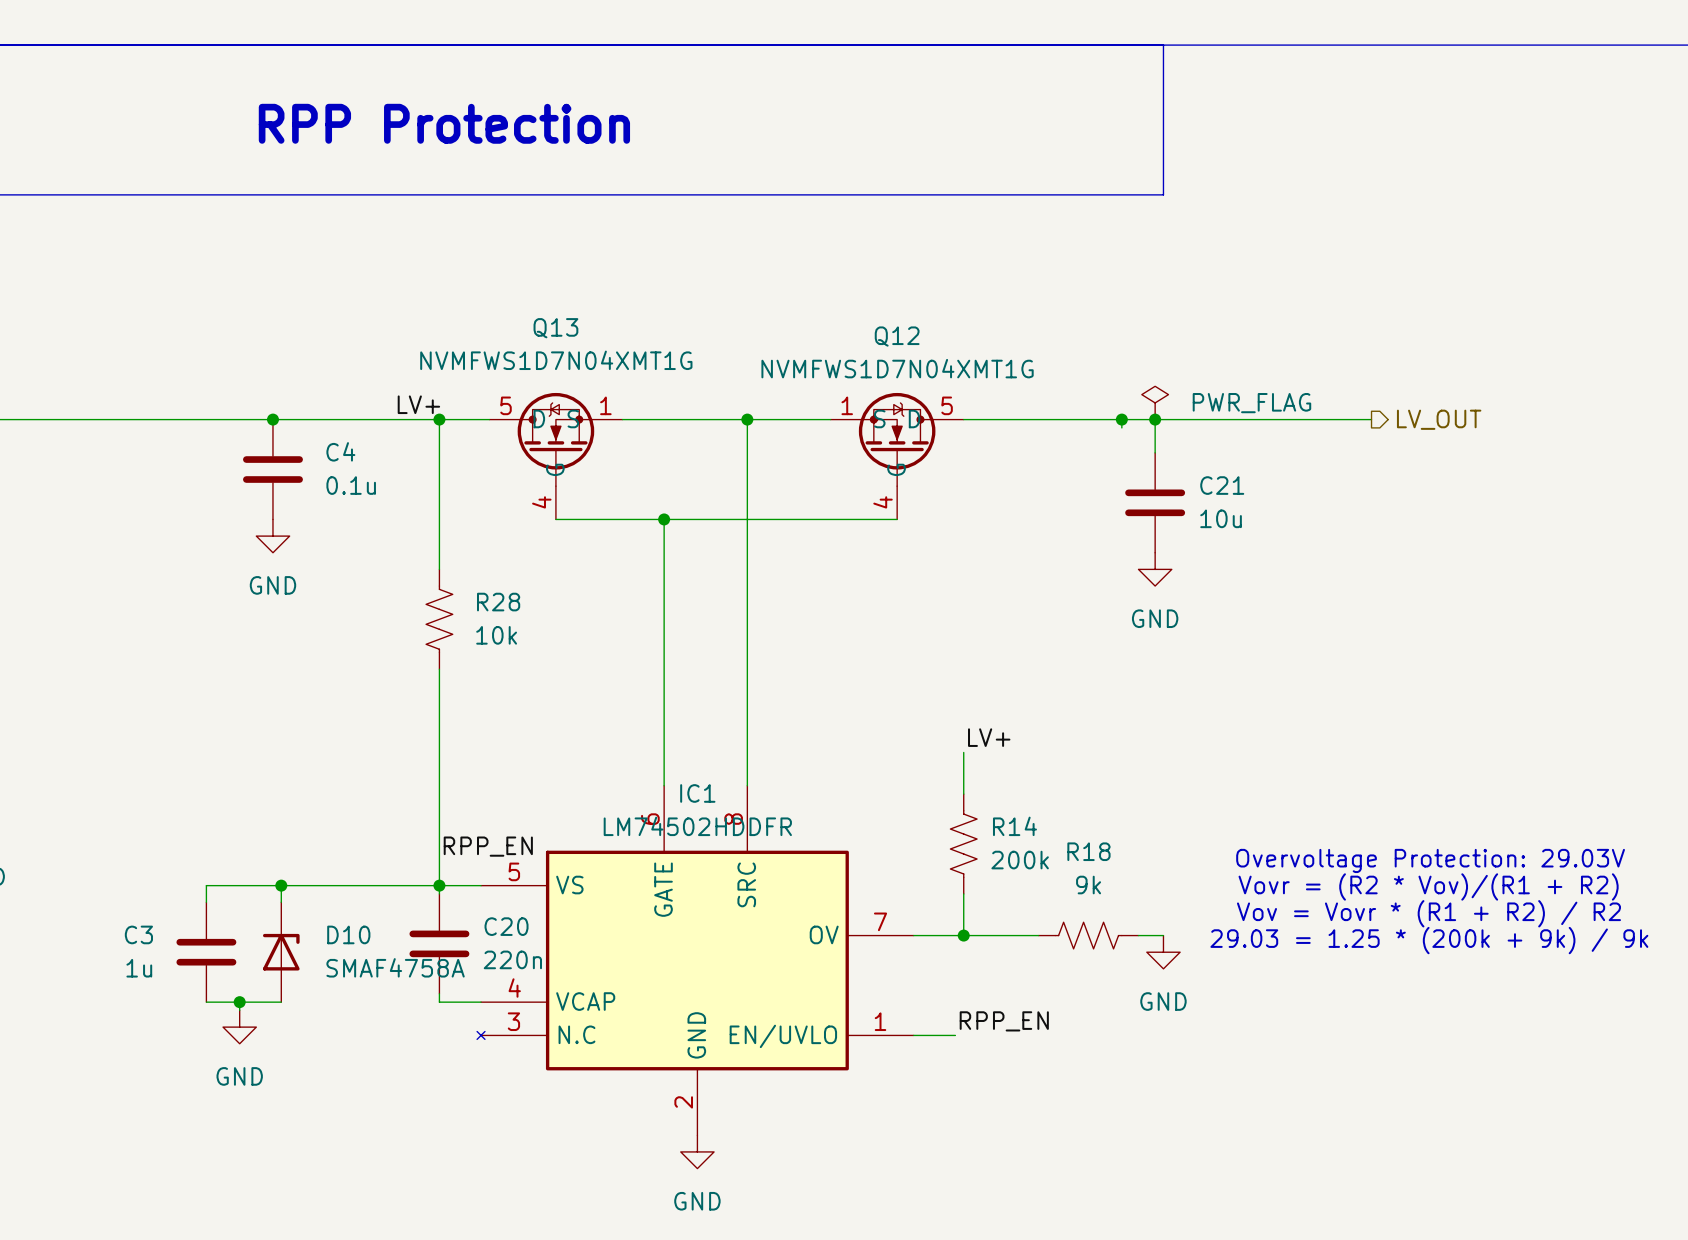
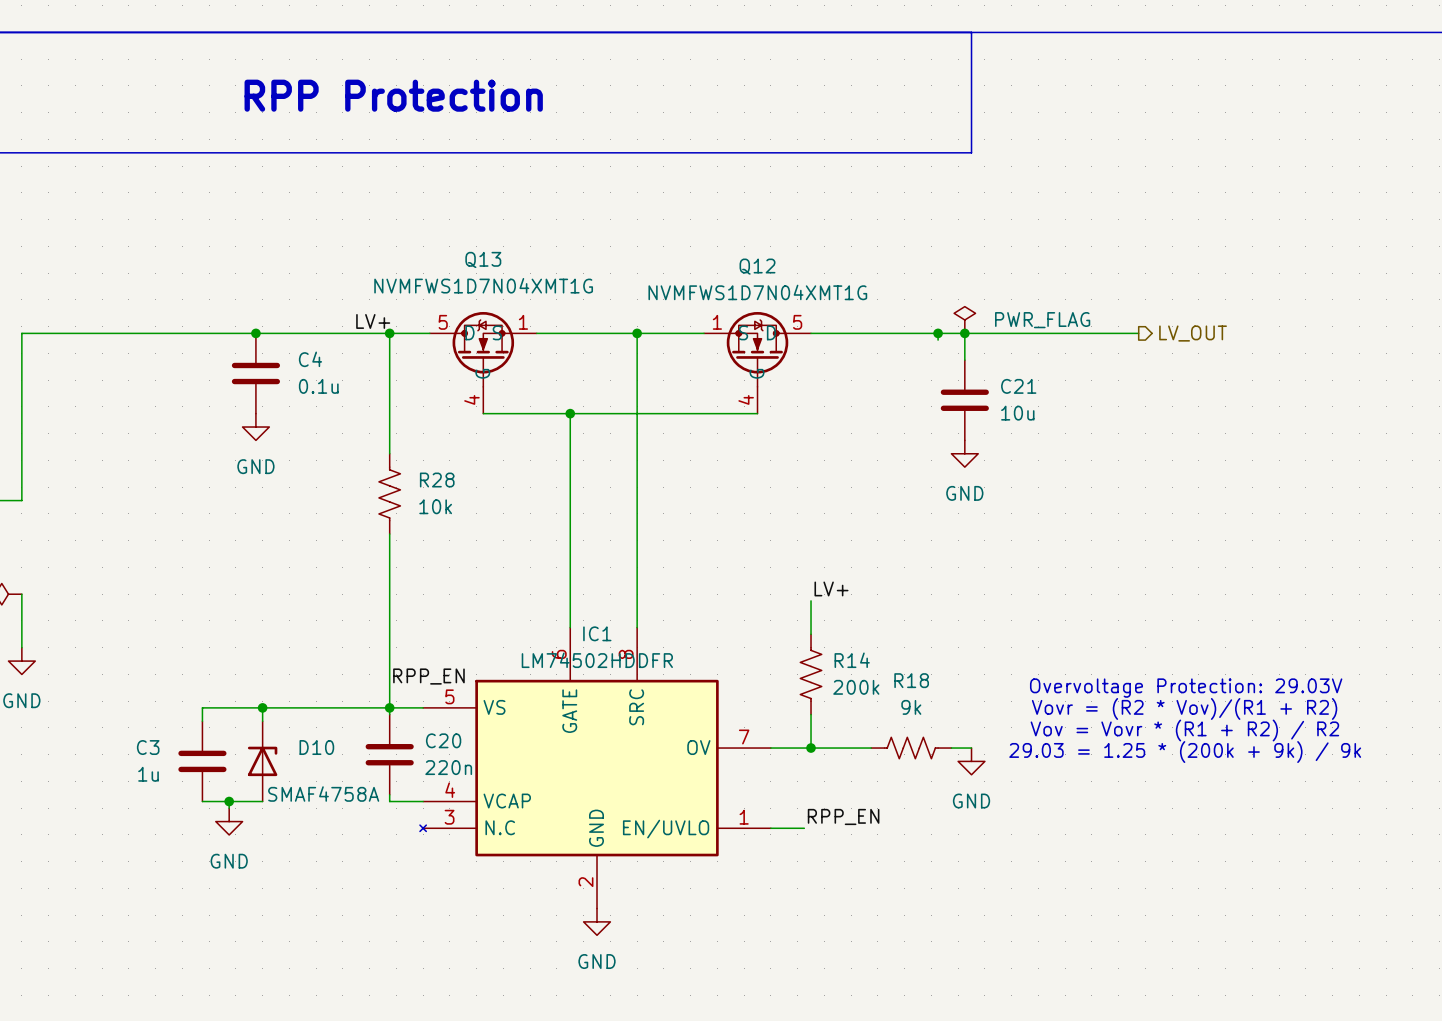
D10 value position: SMAF4758A (395, 967) -> SMAF4758A (323, 794)

